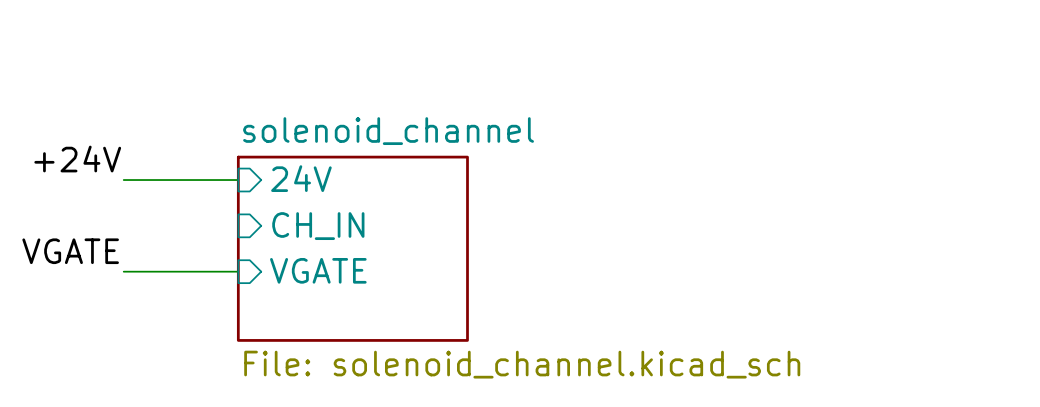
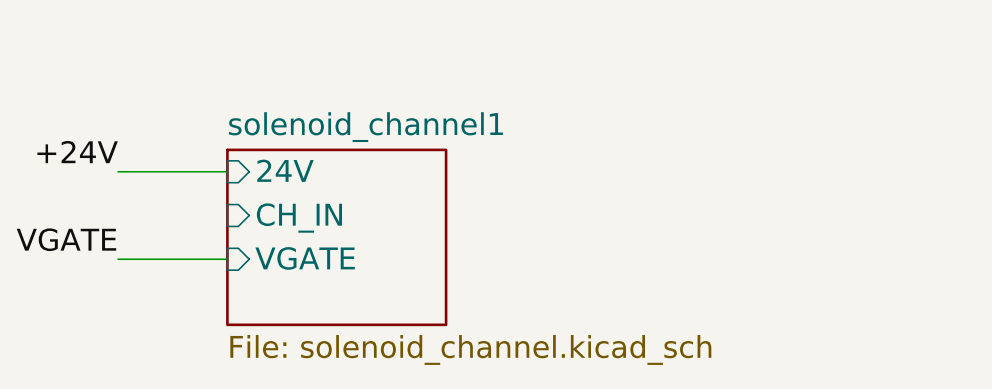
sheet solenoid_channel name: solenoid_channel (388, 131) -> solenoid_channel1 (365, 127)

